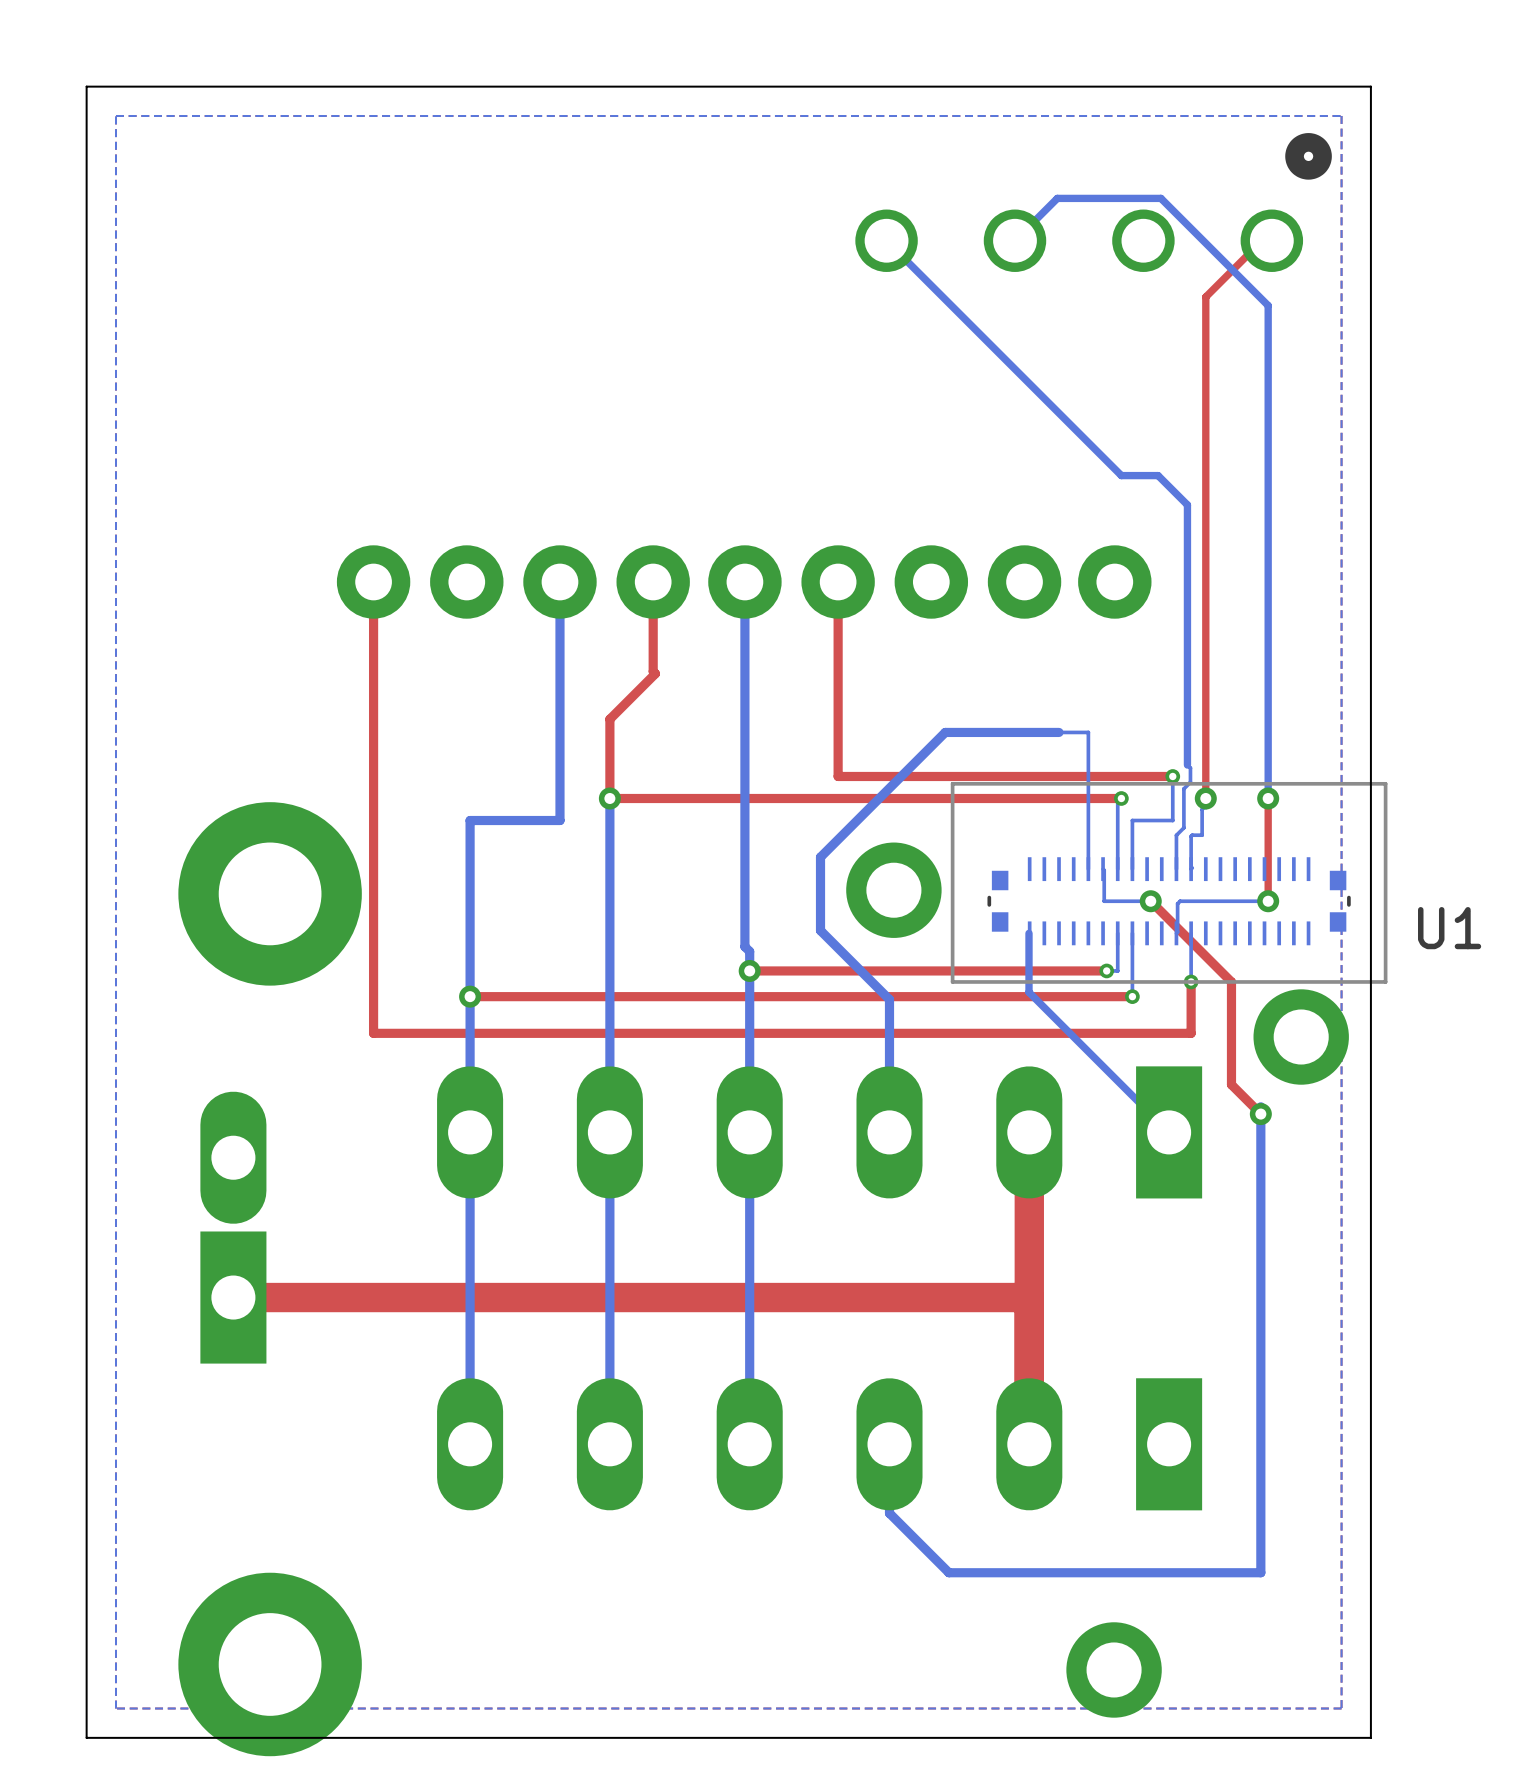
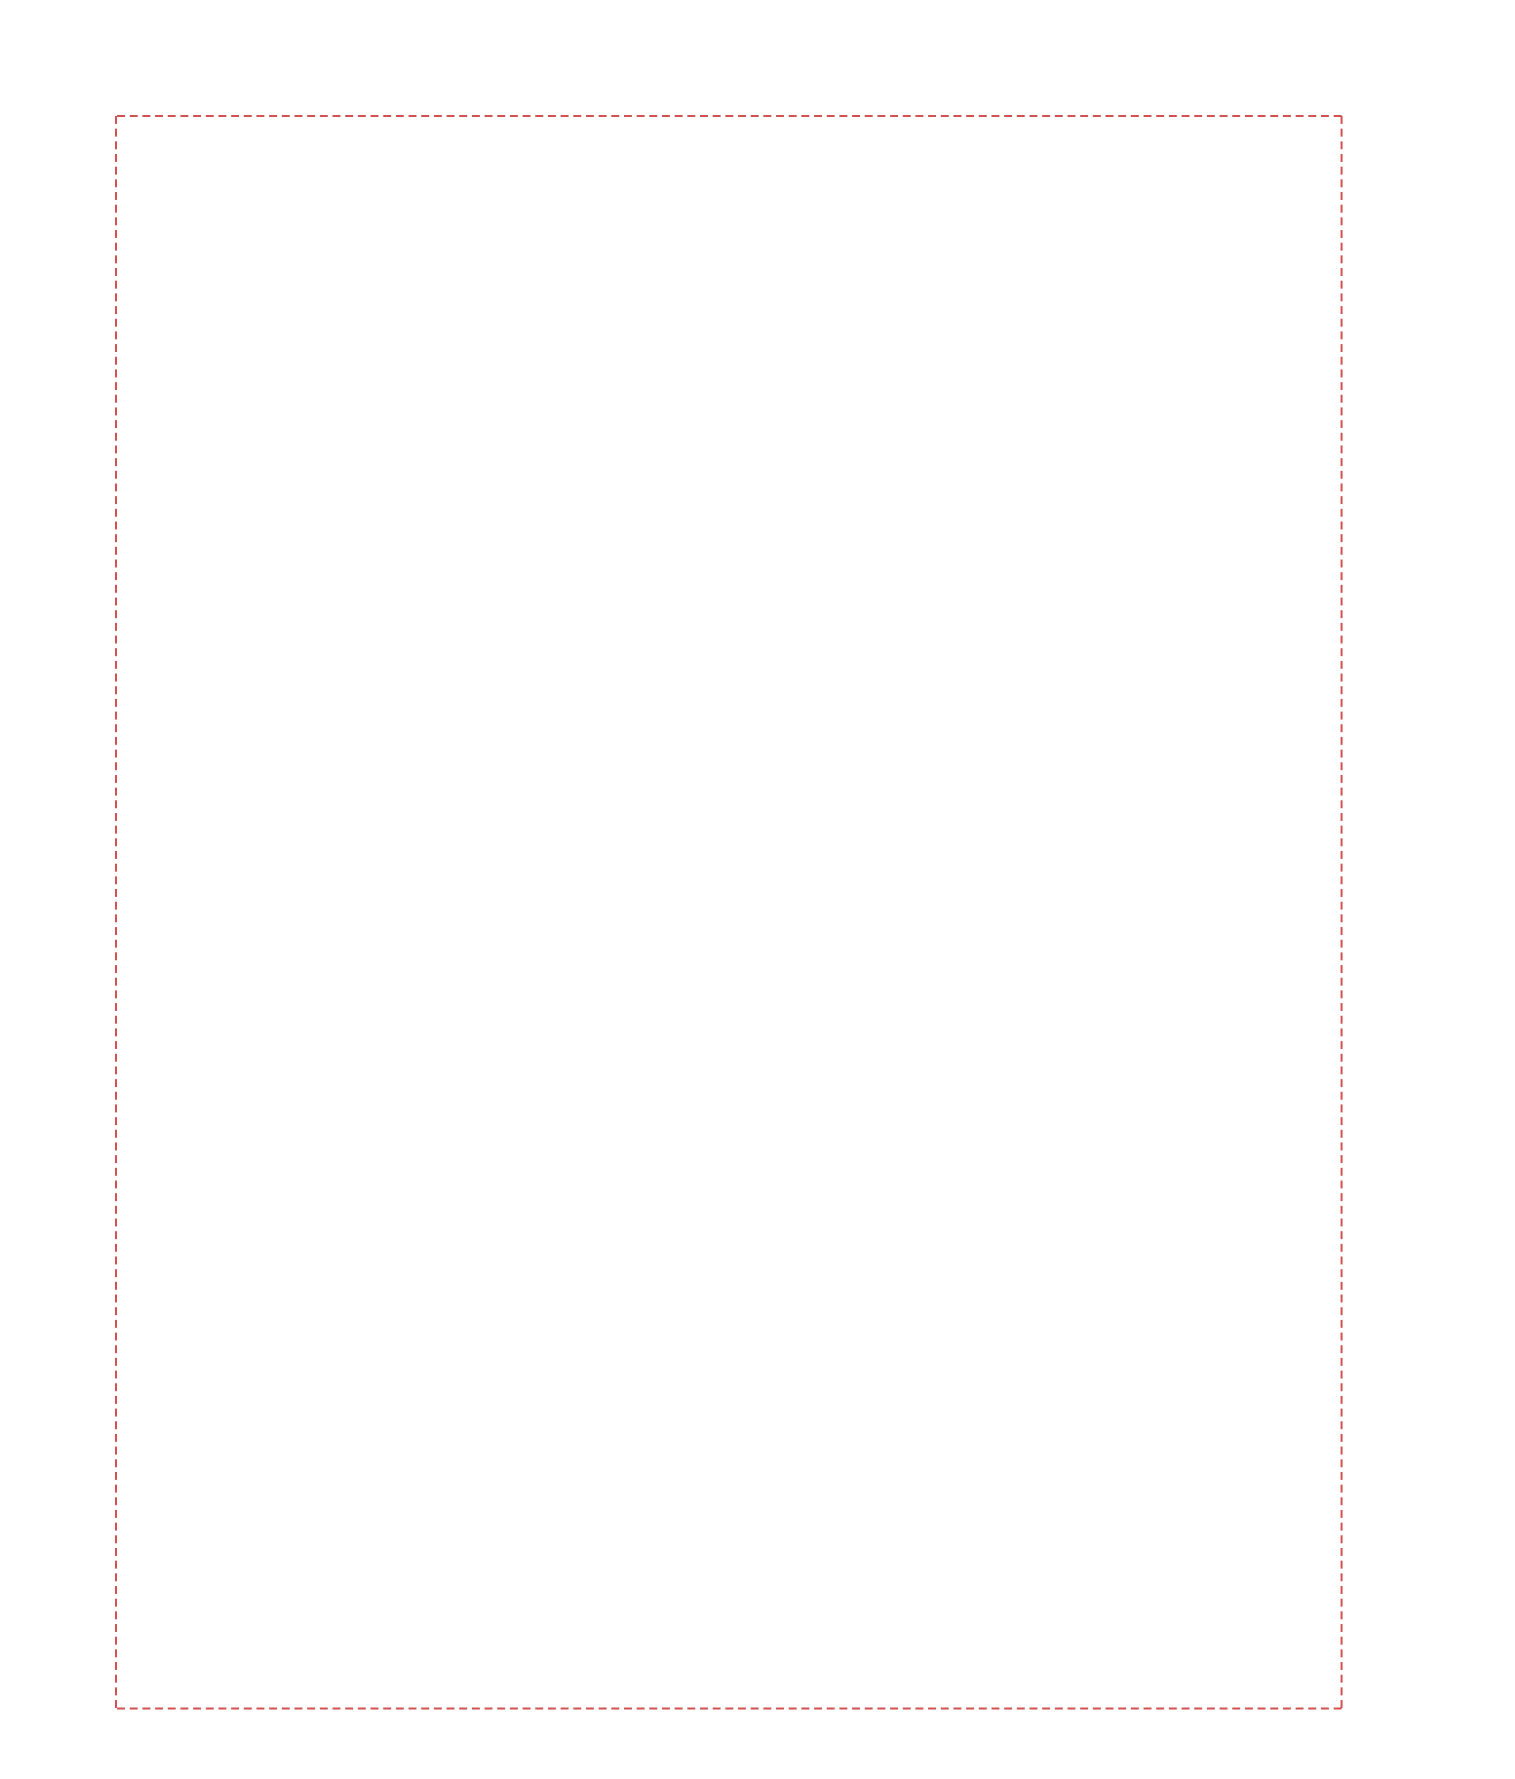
board edge: (1370, 86) (1370, 1737) (86, 1737) (86, 86) (1370, 86) -> none
bottom zone outline: (1341, 115) (115, 115) (115, 1708) (1341, 1708) (1341, 115) -> none
part: (1093, 202) -> none
bottom track: (886, 240) (1121, 475) (1158, 475) (1187, 504) (1187, 765) (1190, 768) (1190, 782) (1183, 788) (1183, 827) (1176, 835) (1176, 869) -> none
bottom track: (1014, 240) (1057, 198) (1160, 198) (1268, 305) (1268, 798) -> none
top track: (1255, 247) (1205, 297) (1205, 798) -> none
top track: (373, 582) (373, 1033) (1191, 1033) (1191, 981) -> none
bottom track: (559, 582) (559, 820) (470, 820) (470, 1444) -> none
top track: (653, 582) (653, 671) (655, 673) (609, 719) (609, 798) (1121, 798) -> none
bottom track: (744, 582) (744, 946) (749, 951) (749, 1444) -> none
part: (744, 582) -> none
top track: (838, 582) (838, 776) (1172, 776) -> none
bottom track: (1172, 776) (1172, 820) (1132, 820) (1132, 869) -> none
via: (1172, 776) -> none
bottom track: (609, 798) (609, 1444) -> none
via: (609, 798) -> none
bottom track: (1121, 798) (1117, 798) (1117, 869) -> none
via: (1121, 798) -> none
bottom track: (1205, 798) (1205, 805) (1202, 809) (1202, 835) (1191, 836) (1191, 869) (1192, 867) -> none
via: (1205, 798) -> none
top track: (1268, 798) (1268, 901) -> none
via: (1268, 798) -> none
bottom track: (1088, 869) (1088, 732) (945, 732) (820, 857) (820, 930) (889, 999) (889, 1132) -> none
bottom track: (1103, 869) (1104, 901) (1150, 901) -> none
U1: (1169, 882) -> none
part: (893, 890) -> none
part: (270, 893) -> none
top track: (1150, 901) (1231, 981) (1231, 1084) (1260, 1114) -> none
via: (1150, 901) -> none
bottom track: (1268, 901) (1180, 901) (1177, 903) (1176, 933) -> none
via: (1268, 901) -> none
bottom track: (1029, 933) (1029, 992) (1169, 1132) -> none
bottom track: (1117, 933) (1117, 970) (1106, 970) -> none
bottom track: (1132, 933) (1132, 996) -> none
bottom track: (1191, 933) (1191, 981) -> none
via: (749, 970) -> none
top track: (1106, 970) (749, 970) -> none
via: (1106, 970) -> none
via: (1191, 981) -> none
via: (470, 996) -> none
top track: (1132, 996) (470, 996) -> none
via: (1132, 996) -> none
part: (1301, 1037) -> none
bottom track: (1260, 1106) (1260, 1572) (948, 1572) (889, 1513) (889, 1444) -> none
via: (1260, 1114) -> none
part: (819, 1132) -> none
top track: (1029, 1132) (1029, 1444) -> none
part: (233, 1227) -> none
top track: (1029, 1297) (233, 1297) -> none
part: (819, 1444) -> none
part: (270, 1664) -> none
part: (1114, 1669) -> none

